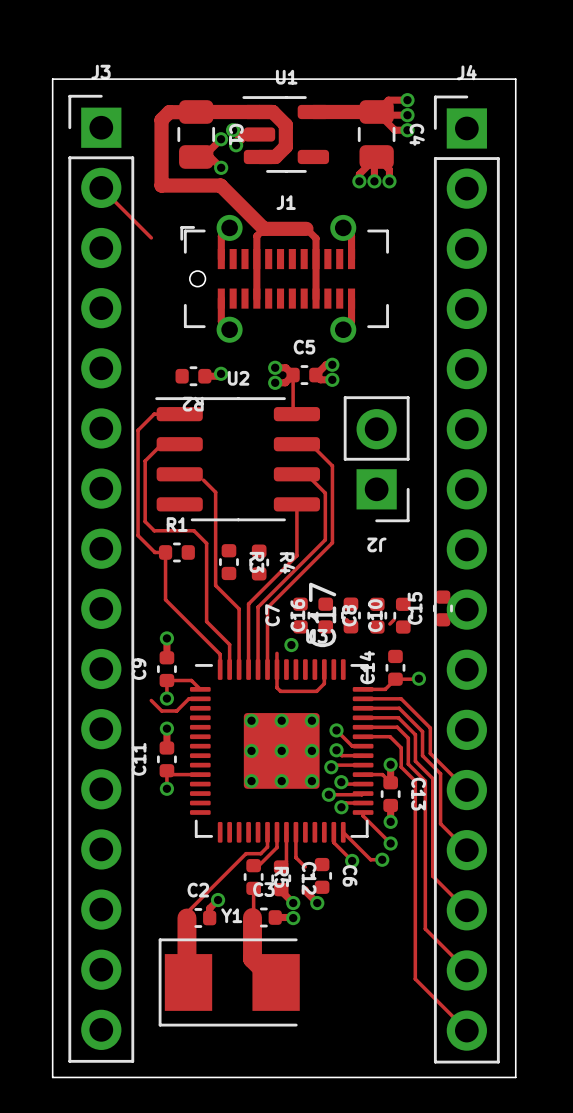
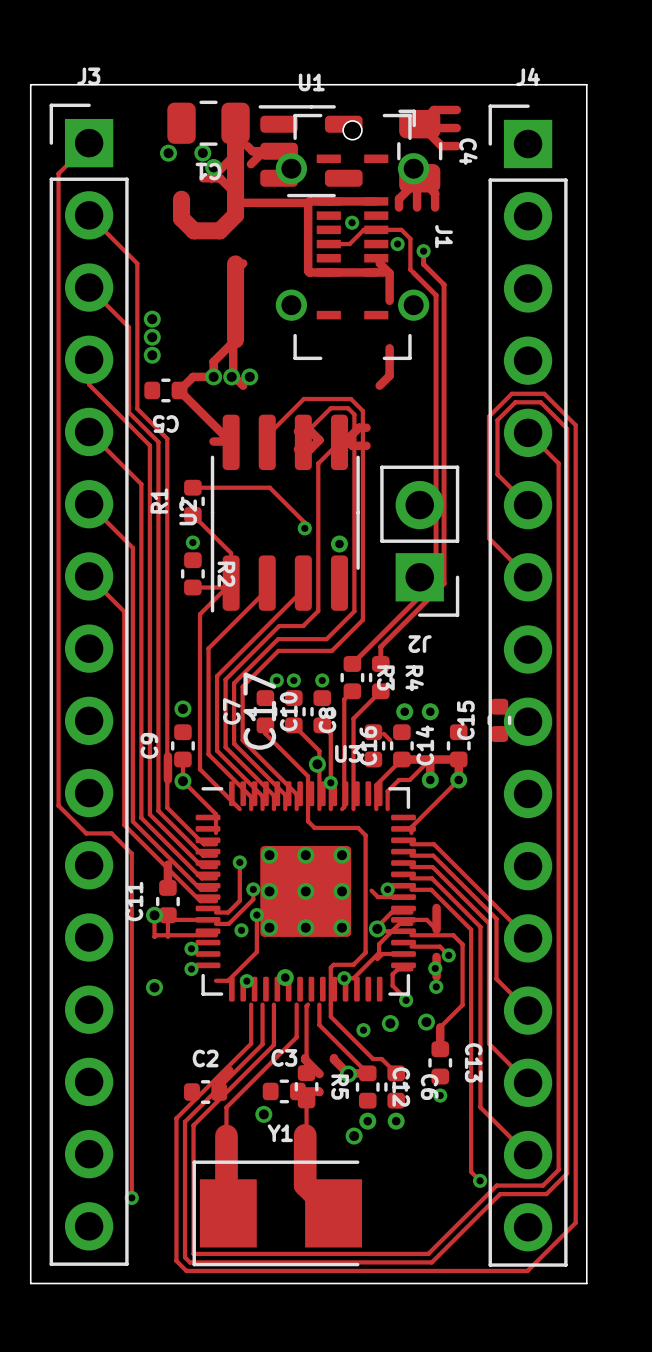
via: (407, 100) -> none
track: none -> (235, 123) (235, 215) (219, 230) (193, 230) (181, 218) (181, 199)
track: (313, 111) (376, 111) -> none
via: (407, 115) -> none
track: none -> (89, 143) (58, 173) (58, 805) (86, 833) (111, 833) (131, 853) (131, 1197)
via: (233, 130) -> none
via: (407, 130) -> none
C1 rotation: 0° (196, 134) -> 90° clockwise (208, 123)
via: none -> (168, 153)
via: none -> (202, 153)
via: (221, 139) -> none
via: (236, 145) -> none
via: none -> (213, 167)
track: (259, 156) (275, 156) (285, 146) (285, 125) (272, 111) (169, 112) (161, 120) (161, 185) (220, 185) (264, 228) -> none
via: (221, 167) -> none
track: none -> (235, 199) (239, 202) (308, 202)
track: none -> (376, 201) (308, 202)
track: none -> (308, 202) (308, 271) (376, 272)
via: (359, 181) -> none
via: (374, 181) -> none
via: (389, 181) -> none
via: none -> (352, 222)
J1 name position: J1 (286, 202) -> J1 (444, 236)
track: none -> (328, 244) (349, 244) (363, 229) (401, 229) (410, 238) (410, 269) (436, 295) (436, 580) (352, 663)
via: none -> (397, 244)
J1 footprint: [180, 214, 389, 343] -> [275, 109, 430, 361]
track: none -> (423, 251) (423, 264) (444, 284) (444, 583) (380, 646) (380, 663)
via: none -> (423, 251)
track: (141, 228) (151, 237) -> (137, 263) (137, 408) (167, 438) (167, 807) (203, 844) (216, 844)
track: none -> (235, 263) (235, 339) (213, 361) (213, 376) (193, 376) (179, 390)
track: (264, 228) (256, 236) (256, 298) -> none
track: (264, 228) (306, 228) (316, 238) (316, 298) -> none
track: none -> (89, 287) (128, 327) (128, 412) (158, 442) (158, 810) (203, 855) (216, 855)
via: none -> (152, 319)
via: none -> (152, 337)
via: none -> (152, 355)
track: none -> (89, 359) (89, 384) (149, 445) (149, 814) (202, 867) (216, 867)
via: none -> (213, 376)
via: none -> (231, 376)
via: none -> (249, 376)
track: none -> (179, 390) (231, 442)
C5 name rotation: 0° (304, 347) -> 180° (165, 423)
C5 name position: C5 (304, 347) -> C5 (165, 423)
via: (332, 364) -> none
via: (275, 367) -> none
track: none -> (89, 431) (141, 484) (141, 818) (201, 878) (216, 878)
track: none -> (528, 432) (558, 463) (558, 1169) (542, 1185) (496, 1185) (428, 1253) (193, 1253) (193, 1125) (273, 1045) (273, 1004)
via: (221, 373) -> none
track: (293, 375) (293, 410) (296, 414) -> none
C5 position: (304, 375) -> (165, 390)
R2 rotation: 0° (193, 376) -> 90° clockwise (192, 573)
R2 position: (193, 376) -> (192, 573)
track: none -> (267, 442) (267, 435) (303, 399) (350, 399) (362, 410) (362, 619) (331, 650) (278, 650) (242, 686) (242, 740) (296, 794) (296, 809)
track: none -> (303, 442) (303, 435) (330, 408) (348, 408) (354, 414) (354, 611) (326, 639) (278, 639) (234, 683) (234, 743) (285, 794) (285, 809)
track: none -> (339, 442) (318, 463) (318, 610) (303, 626) (279, 626) (225, 679) (225, 747) (273, 795) (273, 809)
via: (332, 379) -> none
via: (275, 382) -> none
track: (179, 414) (154, 414) (138, 430) (138, 535) (154, 552) (165, 552) (165, 599) (220, 654) (220, 669) -> none
track: none -> (192, 487) (269, 487) (304, 522) (304, 528)
track: none -> (89, 504) (132, 547) (132, 821) (201, 889) (216, 889)
track: none -> (528, 505) (497, 474) (497, 420) (515, 402) (540, 402) (567, 428) (567, 1173) (546, 1194) (500, 1194) (431, 1262) (189, 1262) (184, 1257) (184, 1121) (262, 1044) (262, 1004)
track: none -> (192, 515) (231, 553) (231, 583) (200, 614) (200, 769) (239, 809)
track: (179, 444) (161, 444) (145, 461) (145, 521) (154, 530) (193, 530) (206, 543) (206, 621) (229, 644) (229, 669) -> none
track: (296, 444) (310, 444) (332, 465) (332, 542) (267, 607) (267, 669) -> none
via: none -> (304, 528)
U2 rotation: 0° (237, 459) -> 90° counterclockwise (285, 513)
via: none -> (192, 542)
via: none -> (339, 544)
track: (296, 474) (306, 474) (325, 493) (325, 539) (258, 607) (258, 669) -> none
track: (203, 480) (215, 492) (215, 585) (239, 608) (239, 669) -> none
track: none -> (89, 576) (124, 611) (124, 825) (200, 901) (216, 901)
track: none -> (528, 577) (488, 538) (488, 416) (511, 393) (544, 393) (575, 425) (575, 1222) (527, 1270) (186, 1270) (176, 1260) (176, 1118) (251, 1043) (251, 1004)
track: none -> (267, 583) (267, 589) (208, 648) (208, 754) (251, 797) (251, 809)
track: none -> (303, 583) (303, 589) (217, 676) (217, 750) (262, 796) (262, 809)
track: none -> (192, 587) (226, 587)
track: (296, 504) (296, 555) (248, 604) (248, 669) -> none
R1 rotation: 0° (176, 552) -> 90° clockwise (192, 501)
R1 position: (176, 552) -> (192, 501)
R3 position: (228, 562) -> (352, 677)
R4 position: (259, 562) -> (380, 677)
via: none -> (276, 680)
via: none -> (293, 680)
via: none -> (322, 680)
track: none -> (352, 691) (344, 699) (344, 806) (342, 809)
track: none -> (380, 691) (353, 718) (353, 809)
via: none -> (182, 708)
via: none -> (404, 711)
via: none -> (430, 711)
track: none -> (265, 725) (265, 733) (308, 776) (308, 821) (314, 827) (358, 827) (365, 835) (365, 952) (353, 964) (333, 964) (330, 967) (330, 1016) (373, 1059) (381, 1059) (396, 1073)
track: none -> (293, 725) (319, 750) (319, 809)
track: none -> (322, 725) (330, 733) (330, 809)
C7 position: (300, 615) -> (265, 711)
C16 position: (325, 615) -> (401, 745)
C8 name position: C8 (349, 615) -> C8 (327, 720)
C17 position: (350, 615) -> (293, 711)
C8 position: (377, 615) -> (373, 745)
C10 position: (403, 615) -> (322, 711)
track: (394, 619) (389, 624) -> none
via: (166, 638) -> none
track: none -> (182, 759) (182, 781) (216, 814) (216, 832)
track: (276, 653) (276, 687) (280, 691) (316, 691) (324, 683) (324, 669) -> none
track: none -> (430, 779) (430, 759) (409, 779) (399, 779) (387, 791) (387, 809)
via: none -> (430, 779)
via: none -> (458, 779)
via: none -> (182, 781)
via: none -> (330, 782)
C14 position: (395, 667) -> (458, 745)
C9 position: (166, 669) -> (182, 745)
track: (418, 678) (395, 679) (385, 689) (363, 689) -> none
via: (418, 678) -> none
track: none -> (376, 809) (376, 785) (401, 759) (458, 759) (458, 779) (411, 827) (411, 832)
track: (200, 689) (191, 680) (166, 680) (166, 698) -> none
via: (166, 698) -> none
track: (200, 698) (188, 698) (176, 710) (161, 710) (151, 700) -> none
track: (363, 698) (401, 698) (430, 728) (430, 753) -> (411, 844) (434, 844) (484, 894)
track: (363, 708) (399, 708) (422, 731) (422, 755) -> (411, 855) (433, 855) (474, 897)
track: (363, 717) (398, 717) (415, 734) (415, 761) (432, 778) (432, 876) (434, 877) -> (411, 867) (432, 867) (488, 923) (488, 1043)
track: none -> (239, 862) (239, 900) (228, 912) (216, 912)
via: none -> (239, 862)
track: (363, 727) (397, 727) (408, 738) (408, 764) (425, 781) (425, 928) (427, 930) -> (411, 878) (431, 878) (480, 926) (480, 1107)
via: (166, 728) -> none
track: (336, 730) (352, 746) (363, 746) -> none
via: (336, 730) -> none
track: (363, 736) (390, 736) (401, 747) (401, 767) (415, 781) (415, 979) (466, 1030) -> none
track: none -> (253, 889) (253, 899) (228, 923) (216, 923)
via: none -> (253, 889)
via: none -> (387, 889)
track: none -> (411, 889) (431, 889) (471, 929) (471, 1171) (480, 1180)
via: (336, 750) -> none
via: (390, 764) -> none
track: (363, 765) (333, 765) (331, 767) -> none
via: (331, 767) -> none
track: none -> (411, 912) (391, 912) (379, 925)
track: none -> (154, 915) (154, 936) (156, 935) (216, 935)
track: none -> (256, 915) (256, 952) (228, 980) (216, 980)
via: none -> (256, 915)
track: none -> (411, 923) (399, 923) (379, 944) (379, 952) (353, 978) (344, 978)
via: none -> (241, 930)
track: none -> (411, 935) (453, 935) (462, 944) (462, 1005) (440, 1027) (440, 1049)
via position: (166, 788) -> (154, 915)
track: (363, 793) (328, 794) -> none
via: (328, 794) -> none
C13 position: (390, 794) -> (440, 1062)
track: none -> (411, 946) (440, 946) (448, 955)
via: none -> (191, 948)
via: none -> (448, 955)
via: (341, 807) -> none
track: (363, 812) (363, 815) (390, 843) -> none
via: none -> (191, 969)
track: none -> (411, 969) (397, 969) (392, 974) (392, 985) (406, 1000)
via: none -> (435, 968)
via: (390, 821) -> none
via: none -> (285, 977)
via: none -> (344, 978)
via: none -> (246, 981)
via: none -> (154, 987)
via: none -> (436, 986)
track: (267, 832) (267, 846) (260, 853) (246, 853) (186, 912) (186, 980) (188, 982) -> none
track: (276, 832) (276, 847) (258, 865) (253, 865) -> none
track: (286, 832) (286, 861) (281, 866) -> none
track: (295, 832) (295, 857) (305, 866) -> none
track: (333, 832) (333, 842) (352, 860) -> none
track: (343, 832) (370, 859) (382, 859) -> none
via: none -> (406, 1000)
via: (390, 843) -> none
track: none -> (296, 1004) (296, 1037) (226, 1107) (226, 1211) (228, 1213)
track: none -> (308, 1004) (306, 1073)
track: none -> (319, 1004) (319, 1025) (367, 1073) (347, 1072)
via: none -> (363, 1030)
C6 position: (322, 875) -> (396, 1087)
R5 position: (253, 877) -> (306, 1086)
C12 position: (281, 878) -> (367, 1087)
track: (253, 888) (252, 958) (276, 982) -> (306, 1100) (305, 1185) (333, 1213)
via: (218, 900) -> none
via: (293, 903) -> none
via: (293, 918) -> none
via: none -> (440, 1095)
via: none -> (263, 1114)
via: none -> (367, 1121)
via: none -> (396, 1121)
via: none -> (354, 1136)
Y1 position: (229, 982) -> (277, 1213)
via: none -> (480, 1180)
via: none -> (131, 1197)

